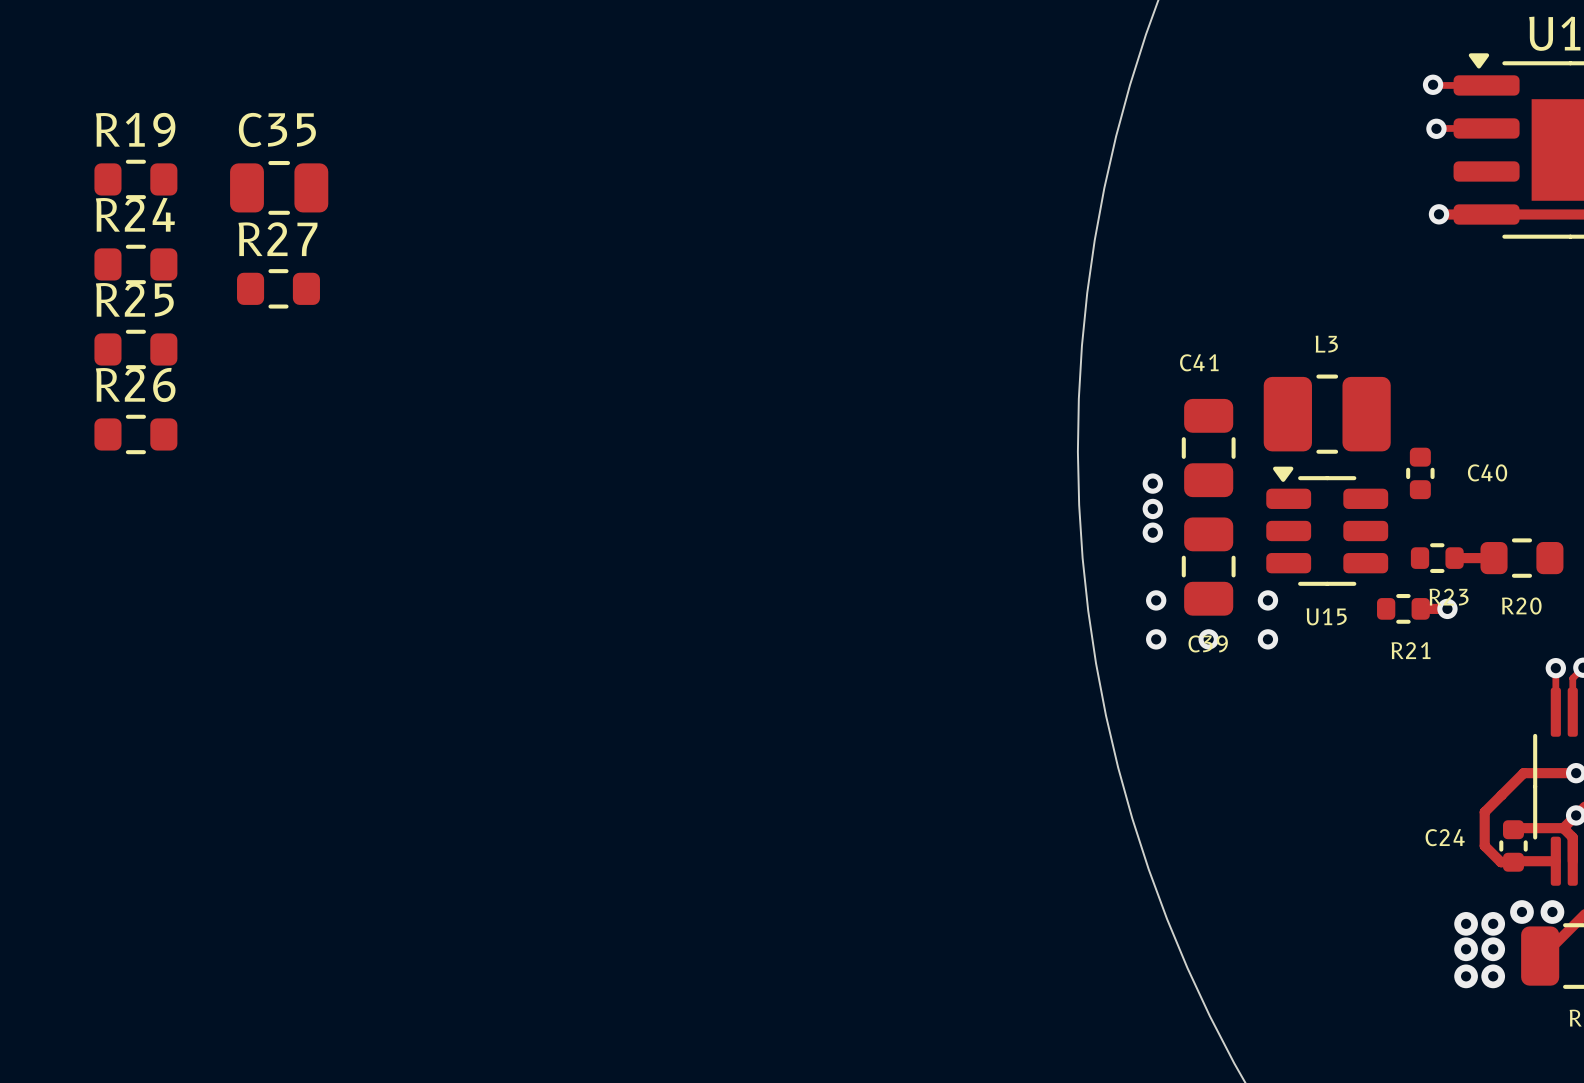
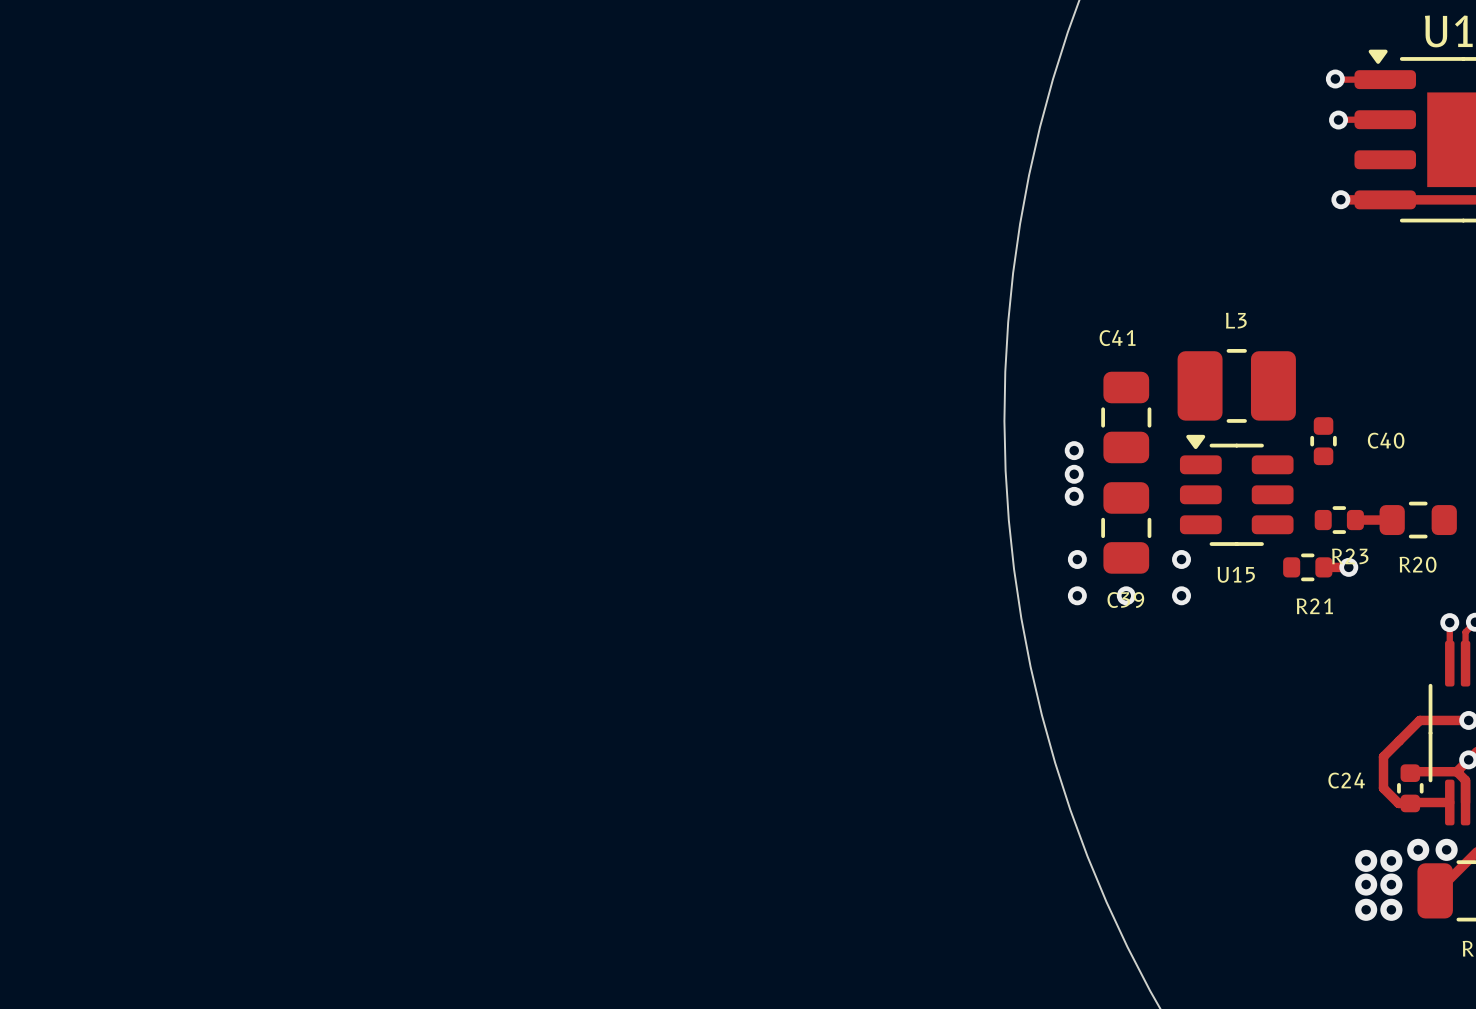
R19: (135, 179) -> none
C35: (279, 187) -> none
R24: (135, 264) -> none
R27: (278, 288) -> none
R25: (135, 349) -> none
R26: (135, 434) -> none

